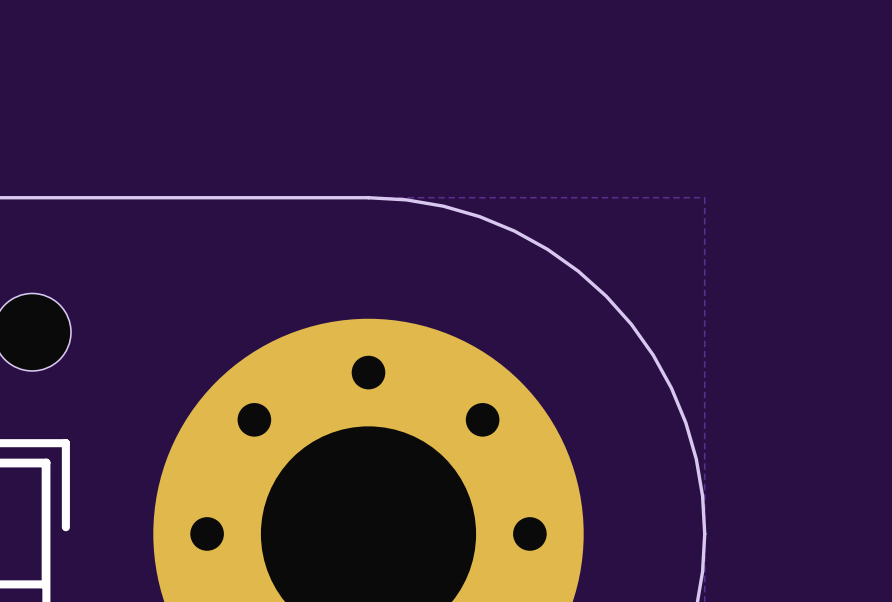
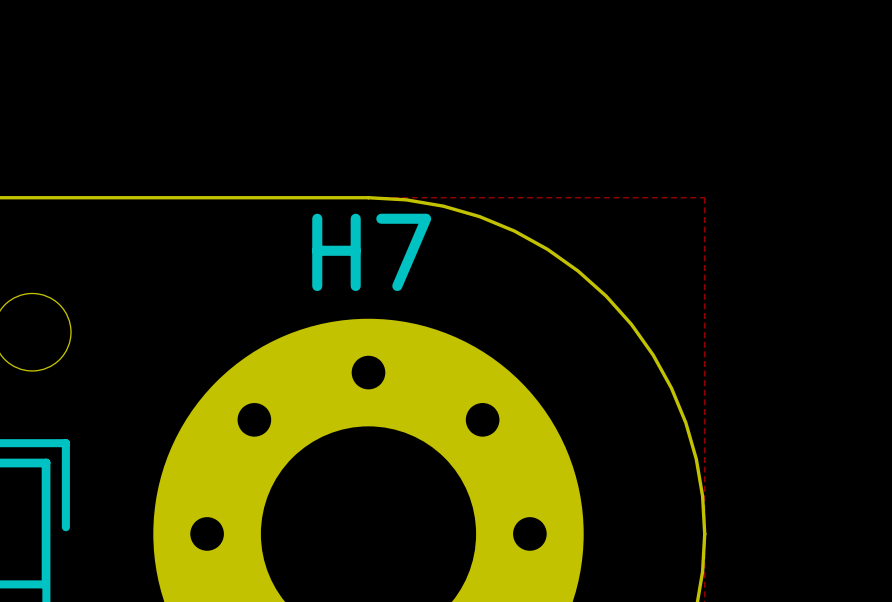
H7 name: none -> H7 (371, 252)

